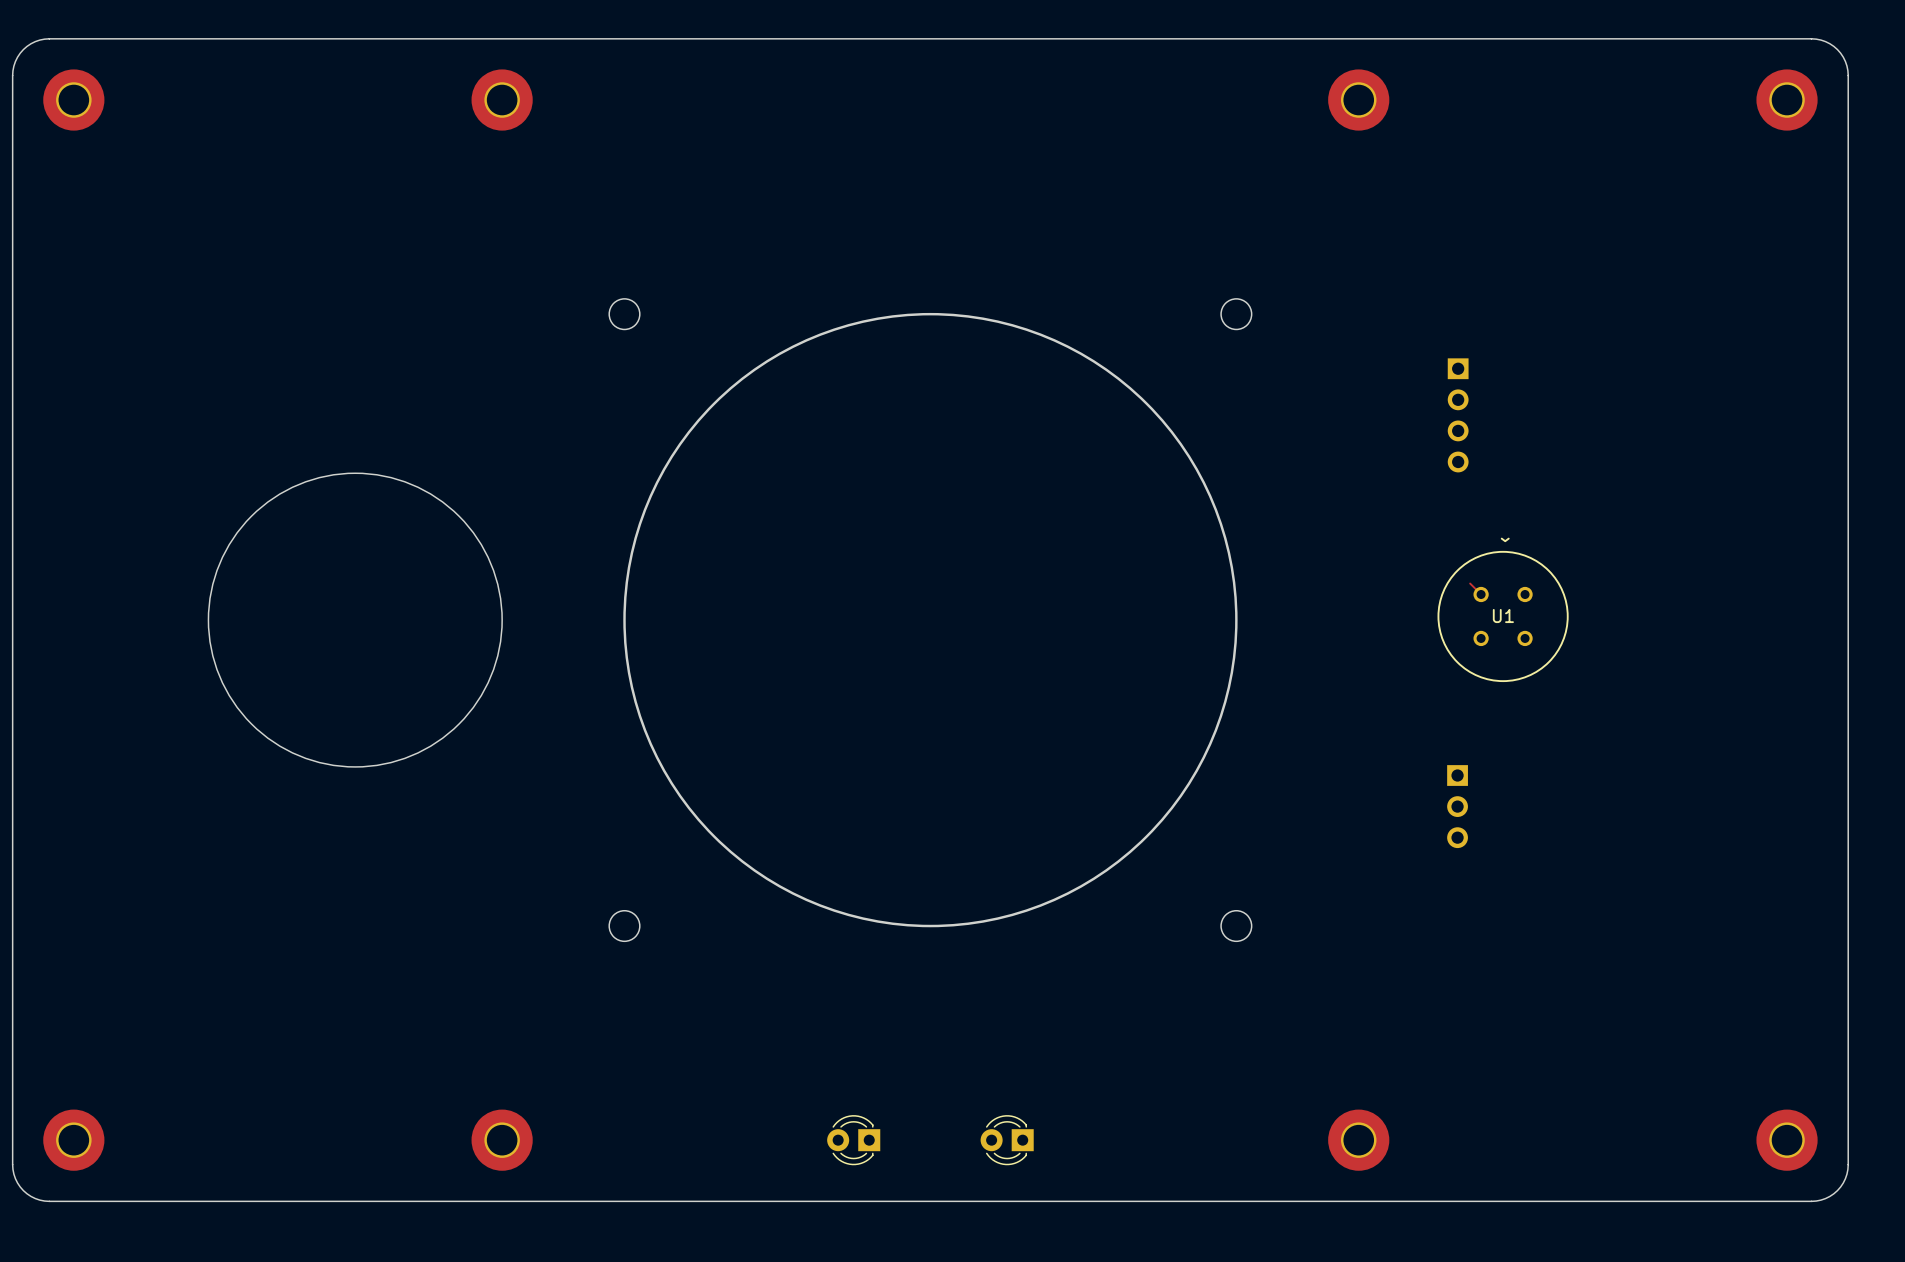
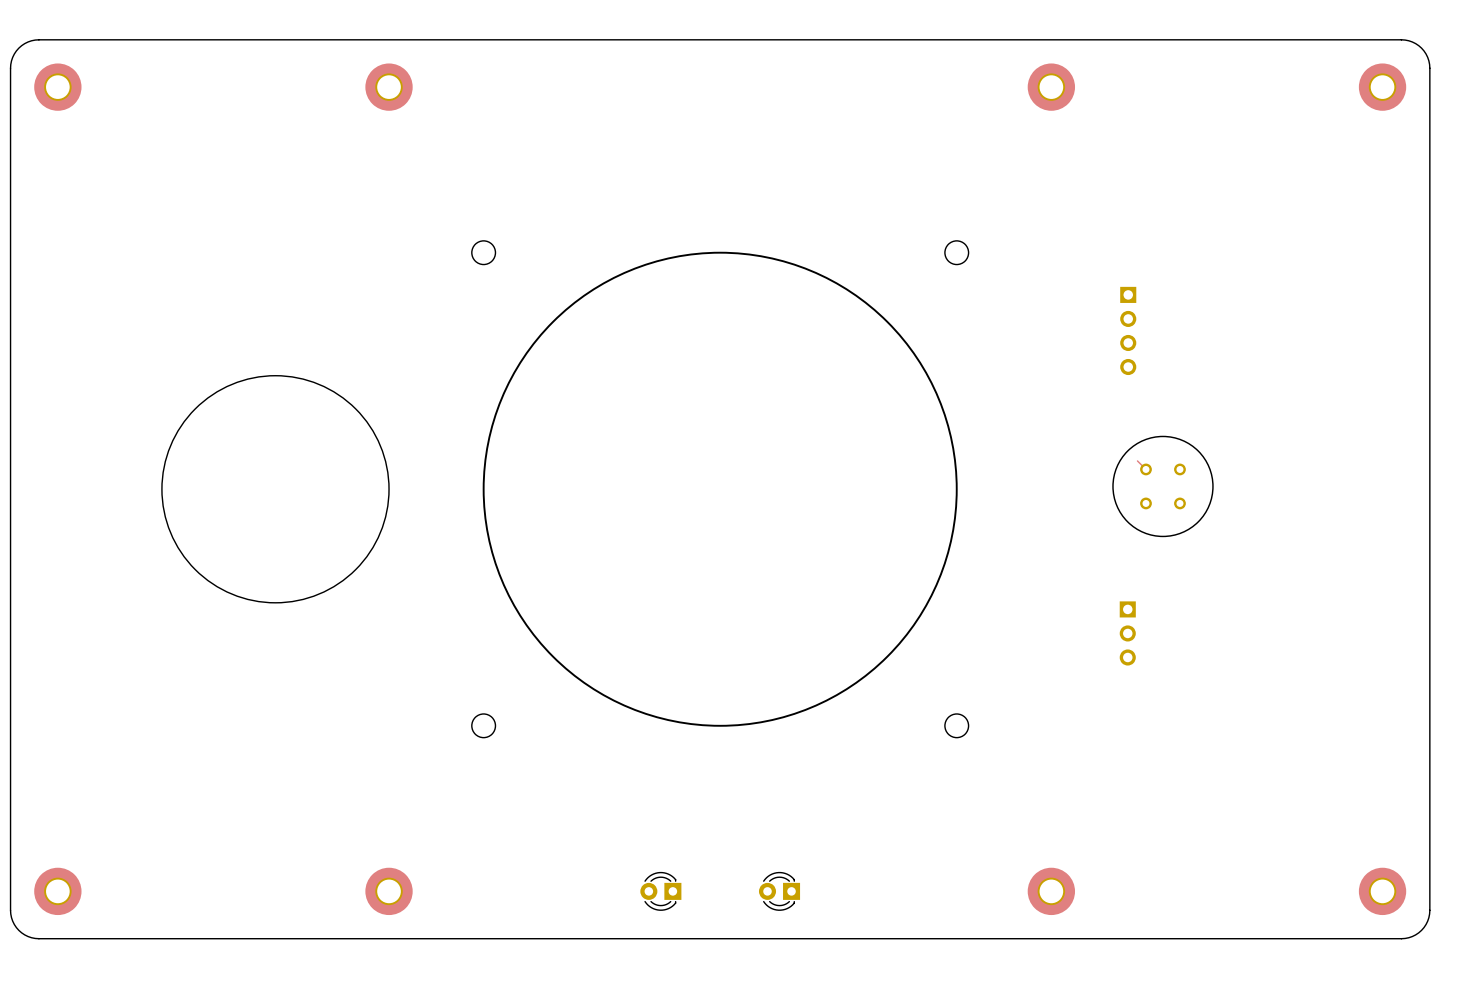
text: ^ (1505, 539) -> none
U1 name: U1 (1503, 616) -> none

